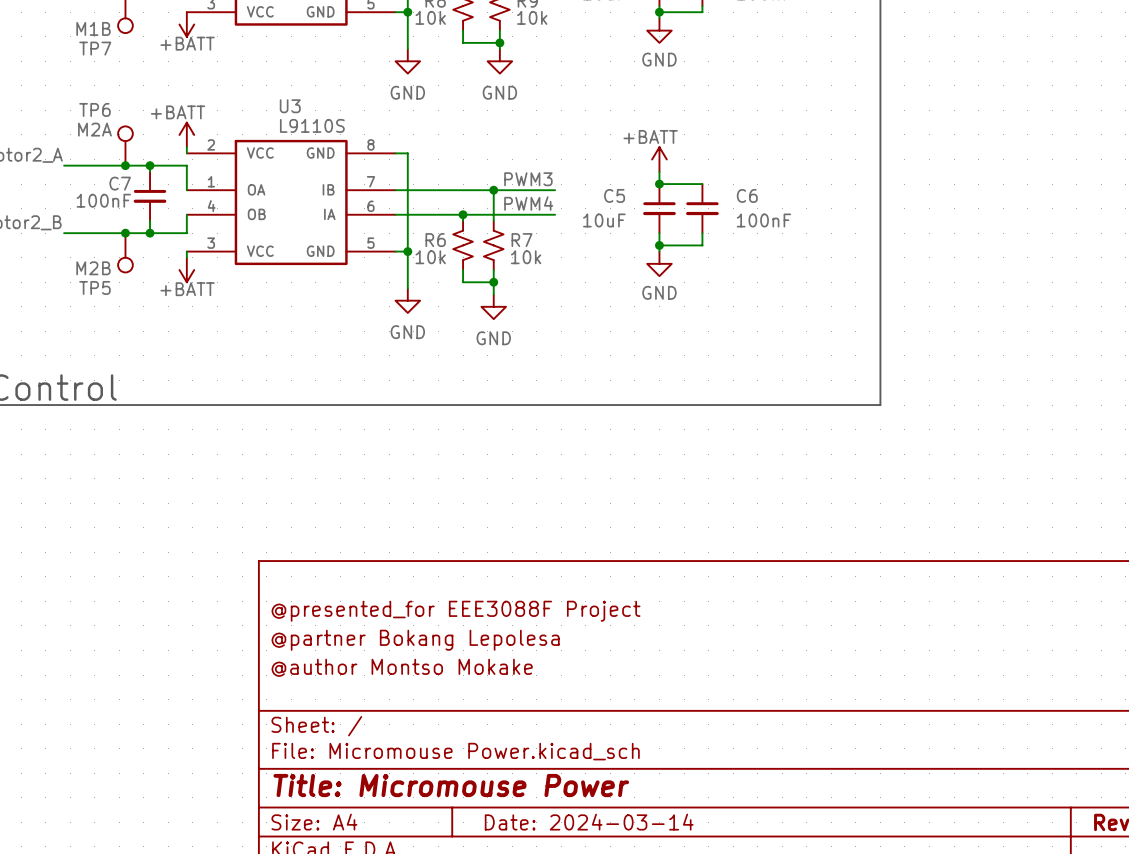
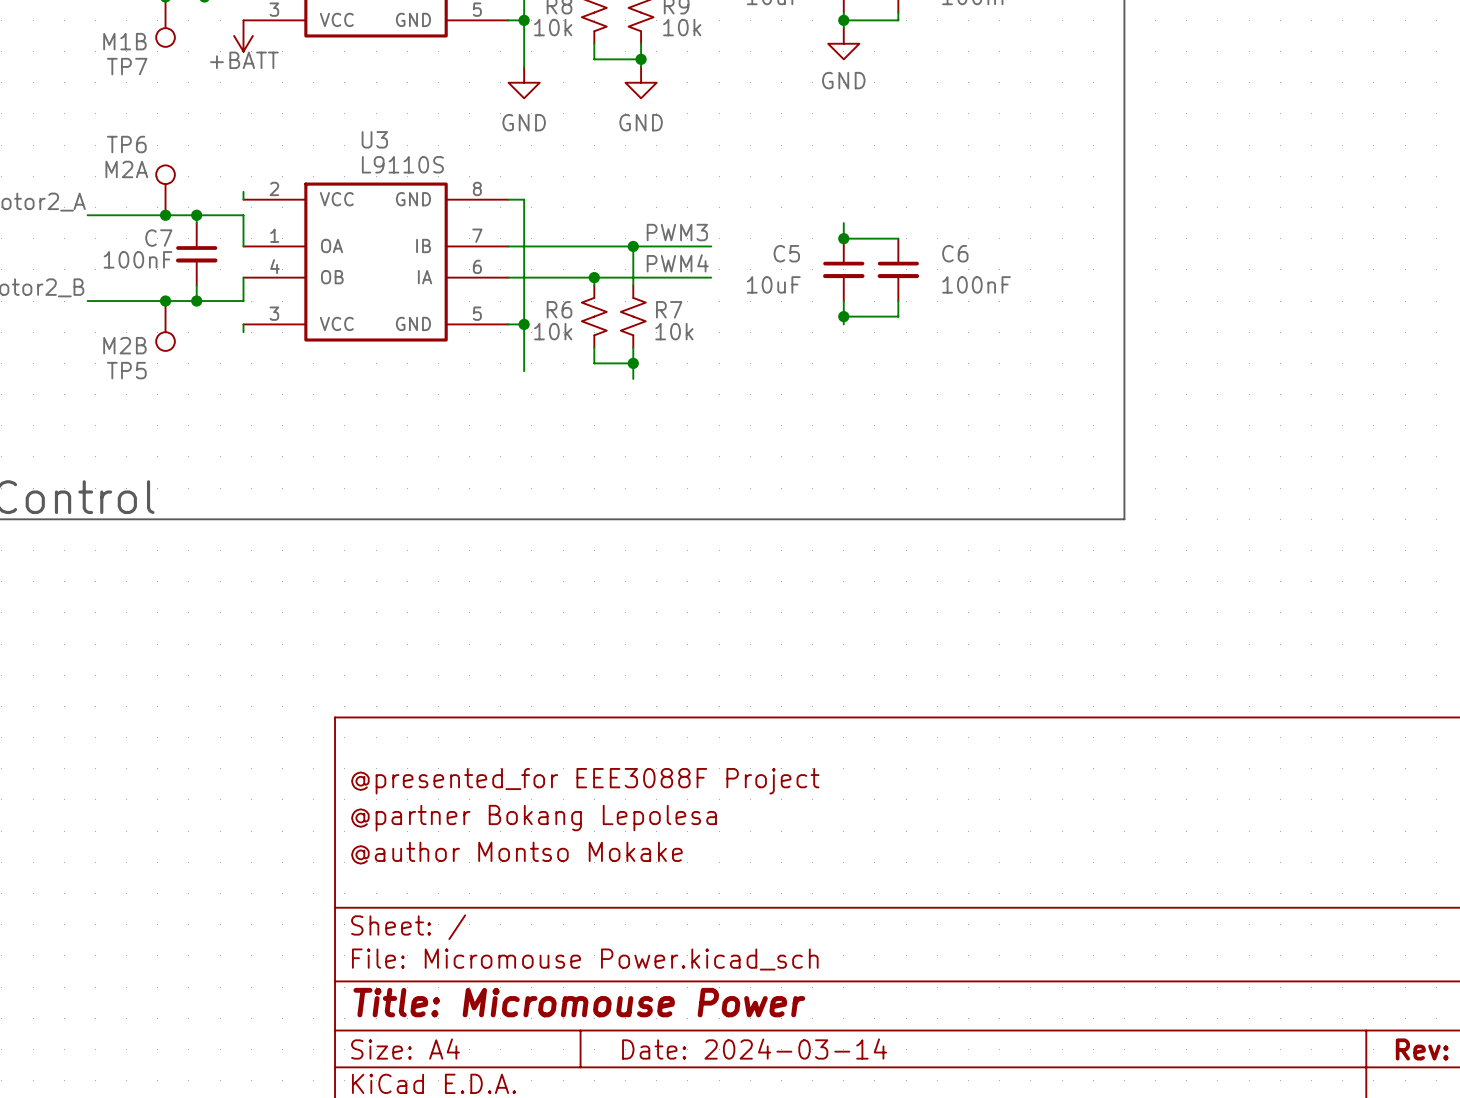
power symbol: +BATT (186, 134) -> none
power symbol: +BATT (659, 159) -> none
power symbol: GND (659, 263) -> none
power symbol: +BATT (186, 269) -> none
power symbol: GND (407, 300) -> none
power symbol: GND (493, 306) -> none

